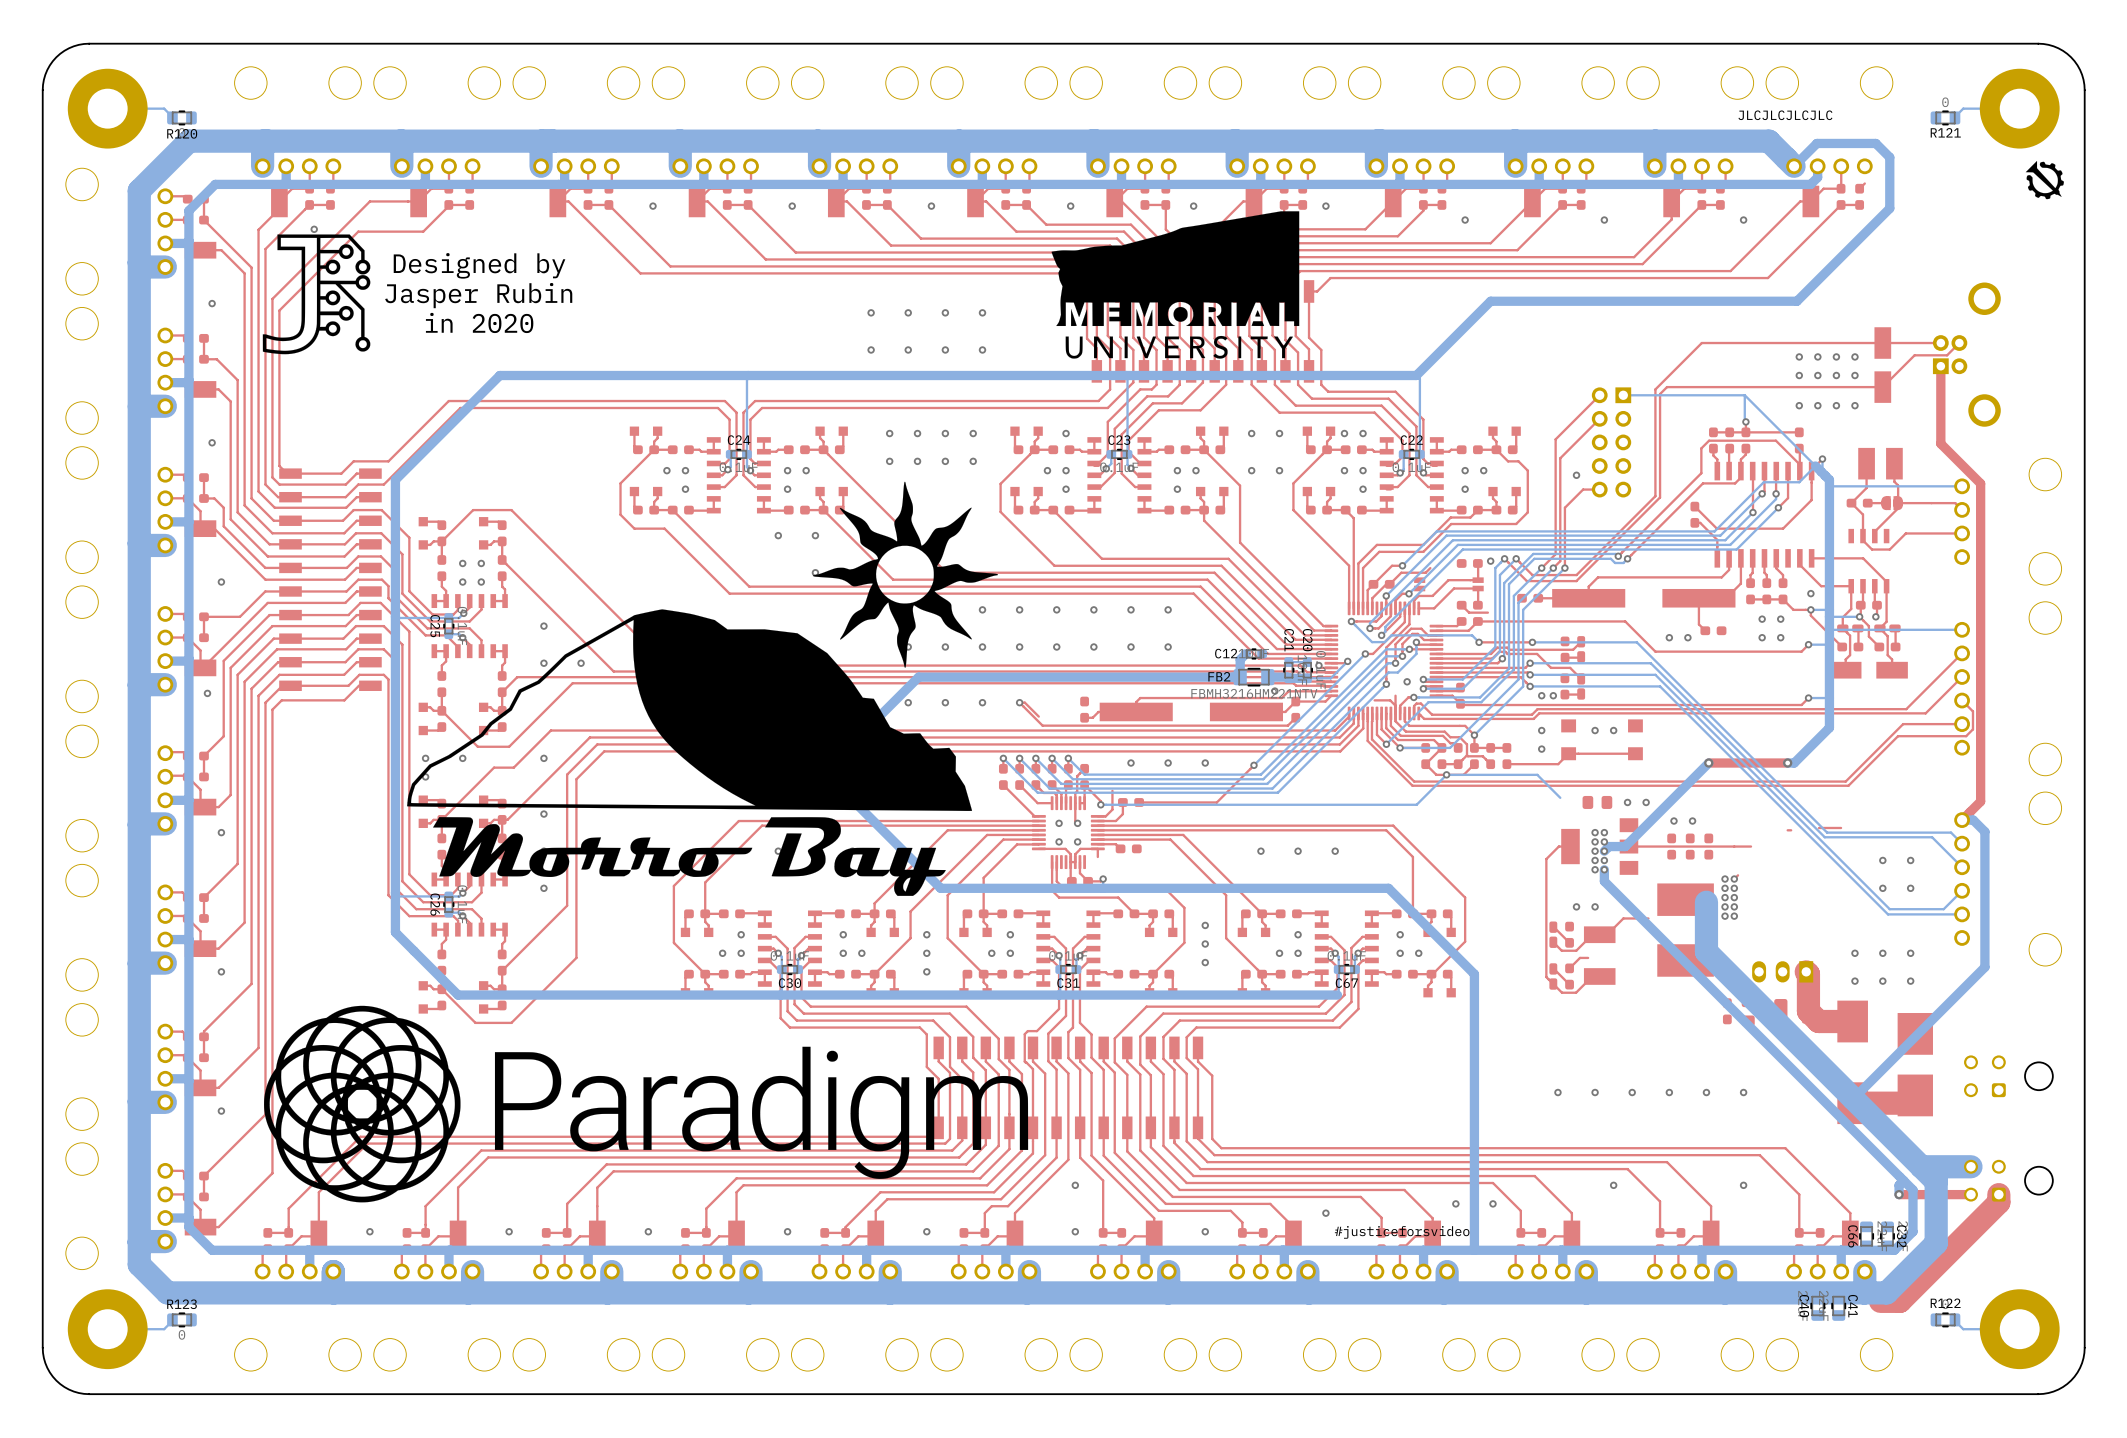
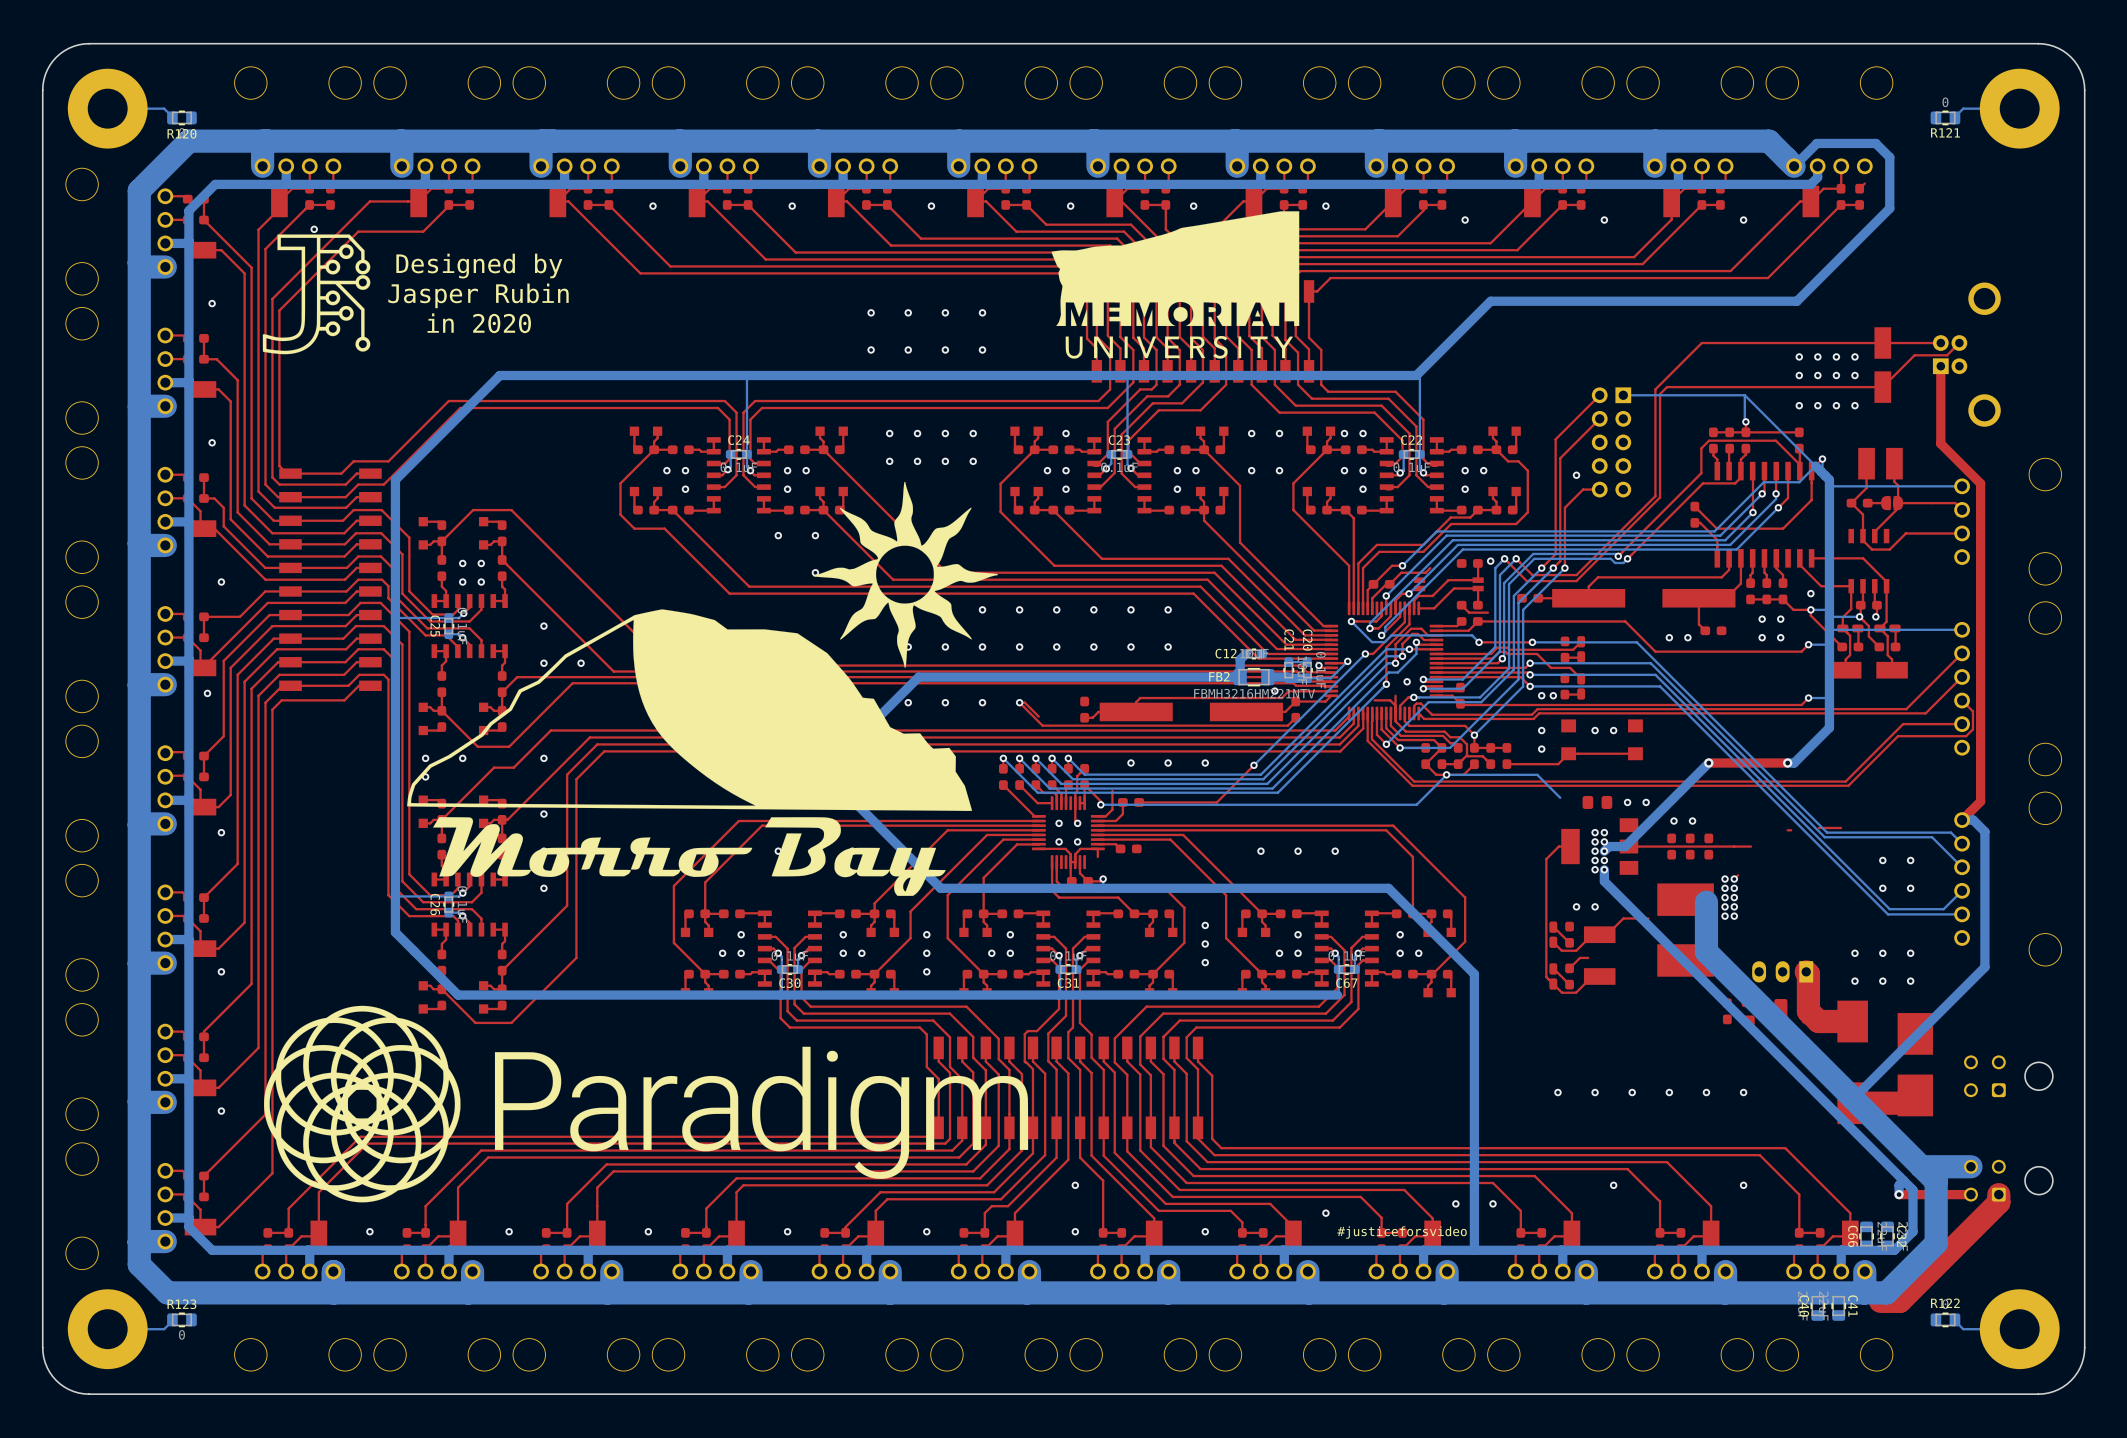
text: JLCJLCJLCJLC (1785, 115) -> none
drawing: [2025, 160, 2064, 200] -> none

